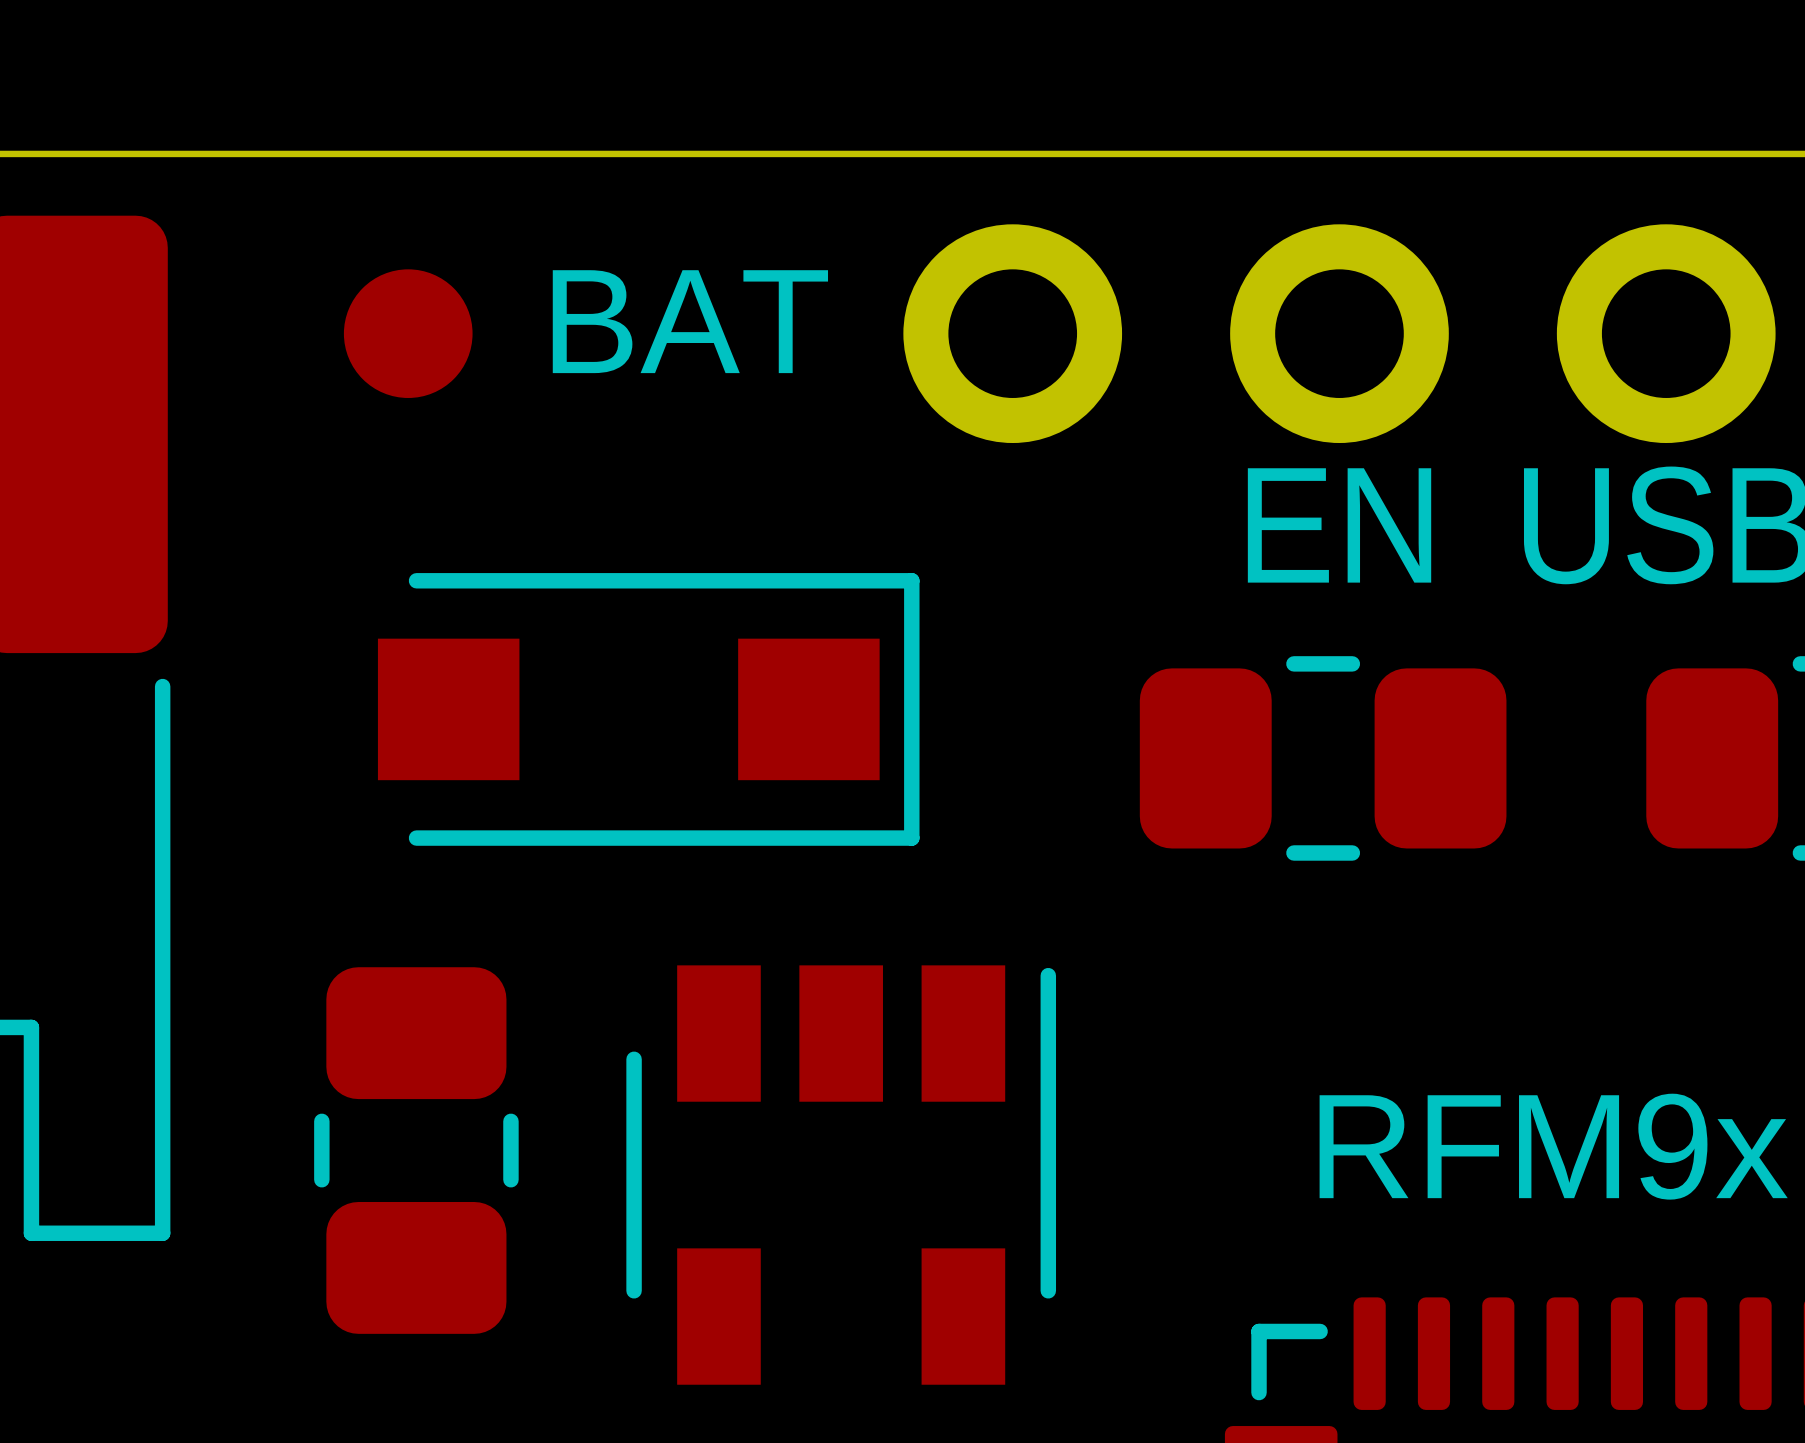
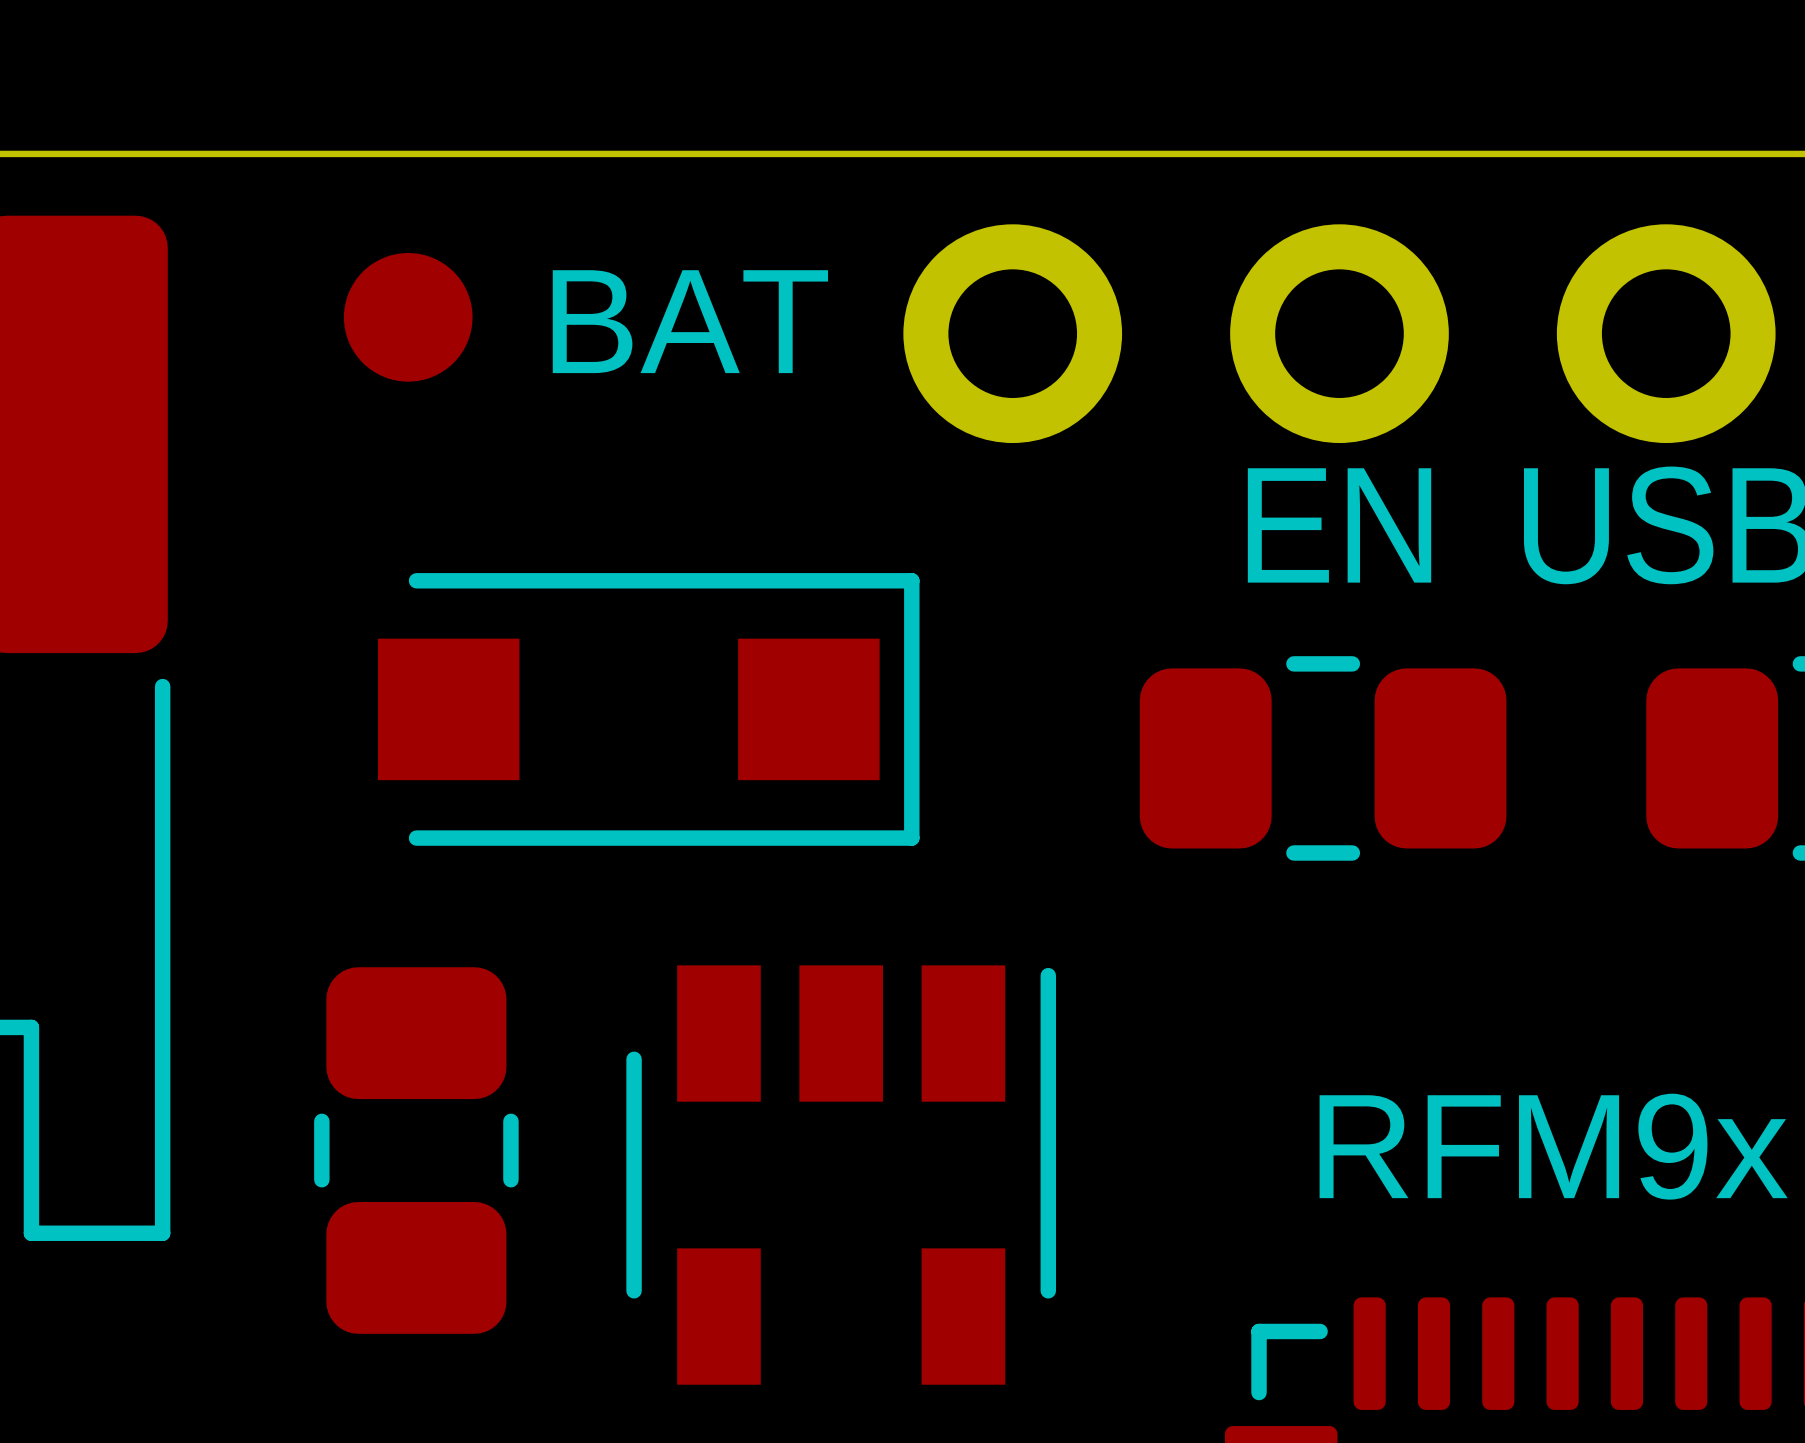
part position: (408, 333) -> (408, 317)

